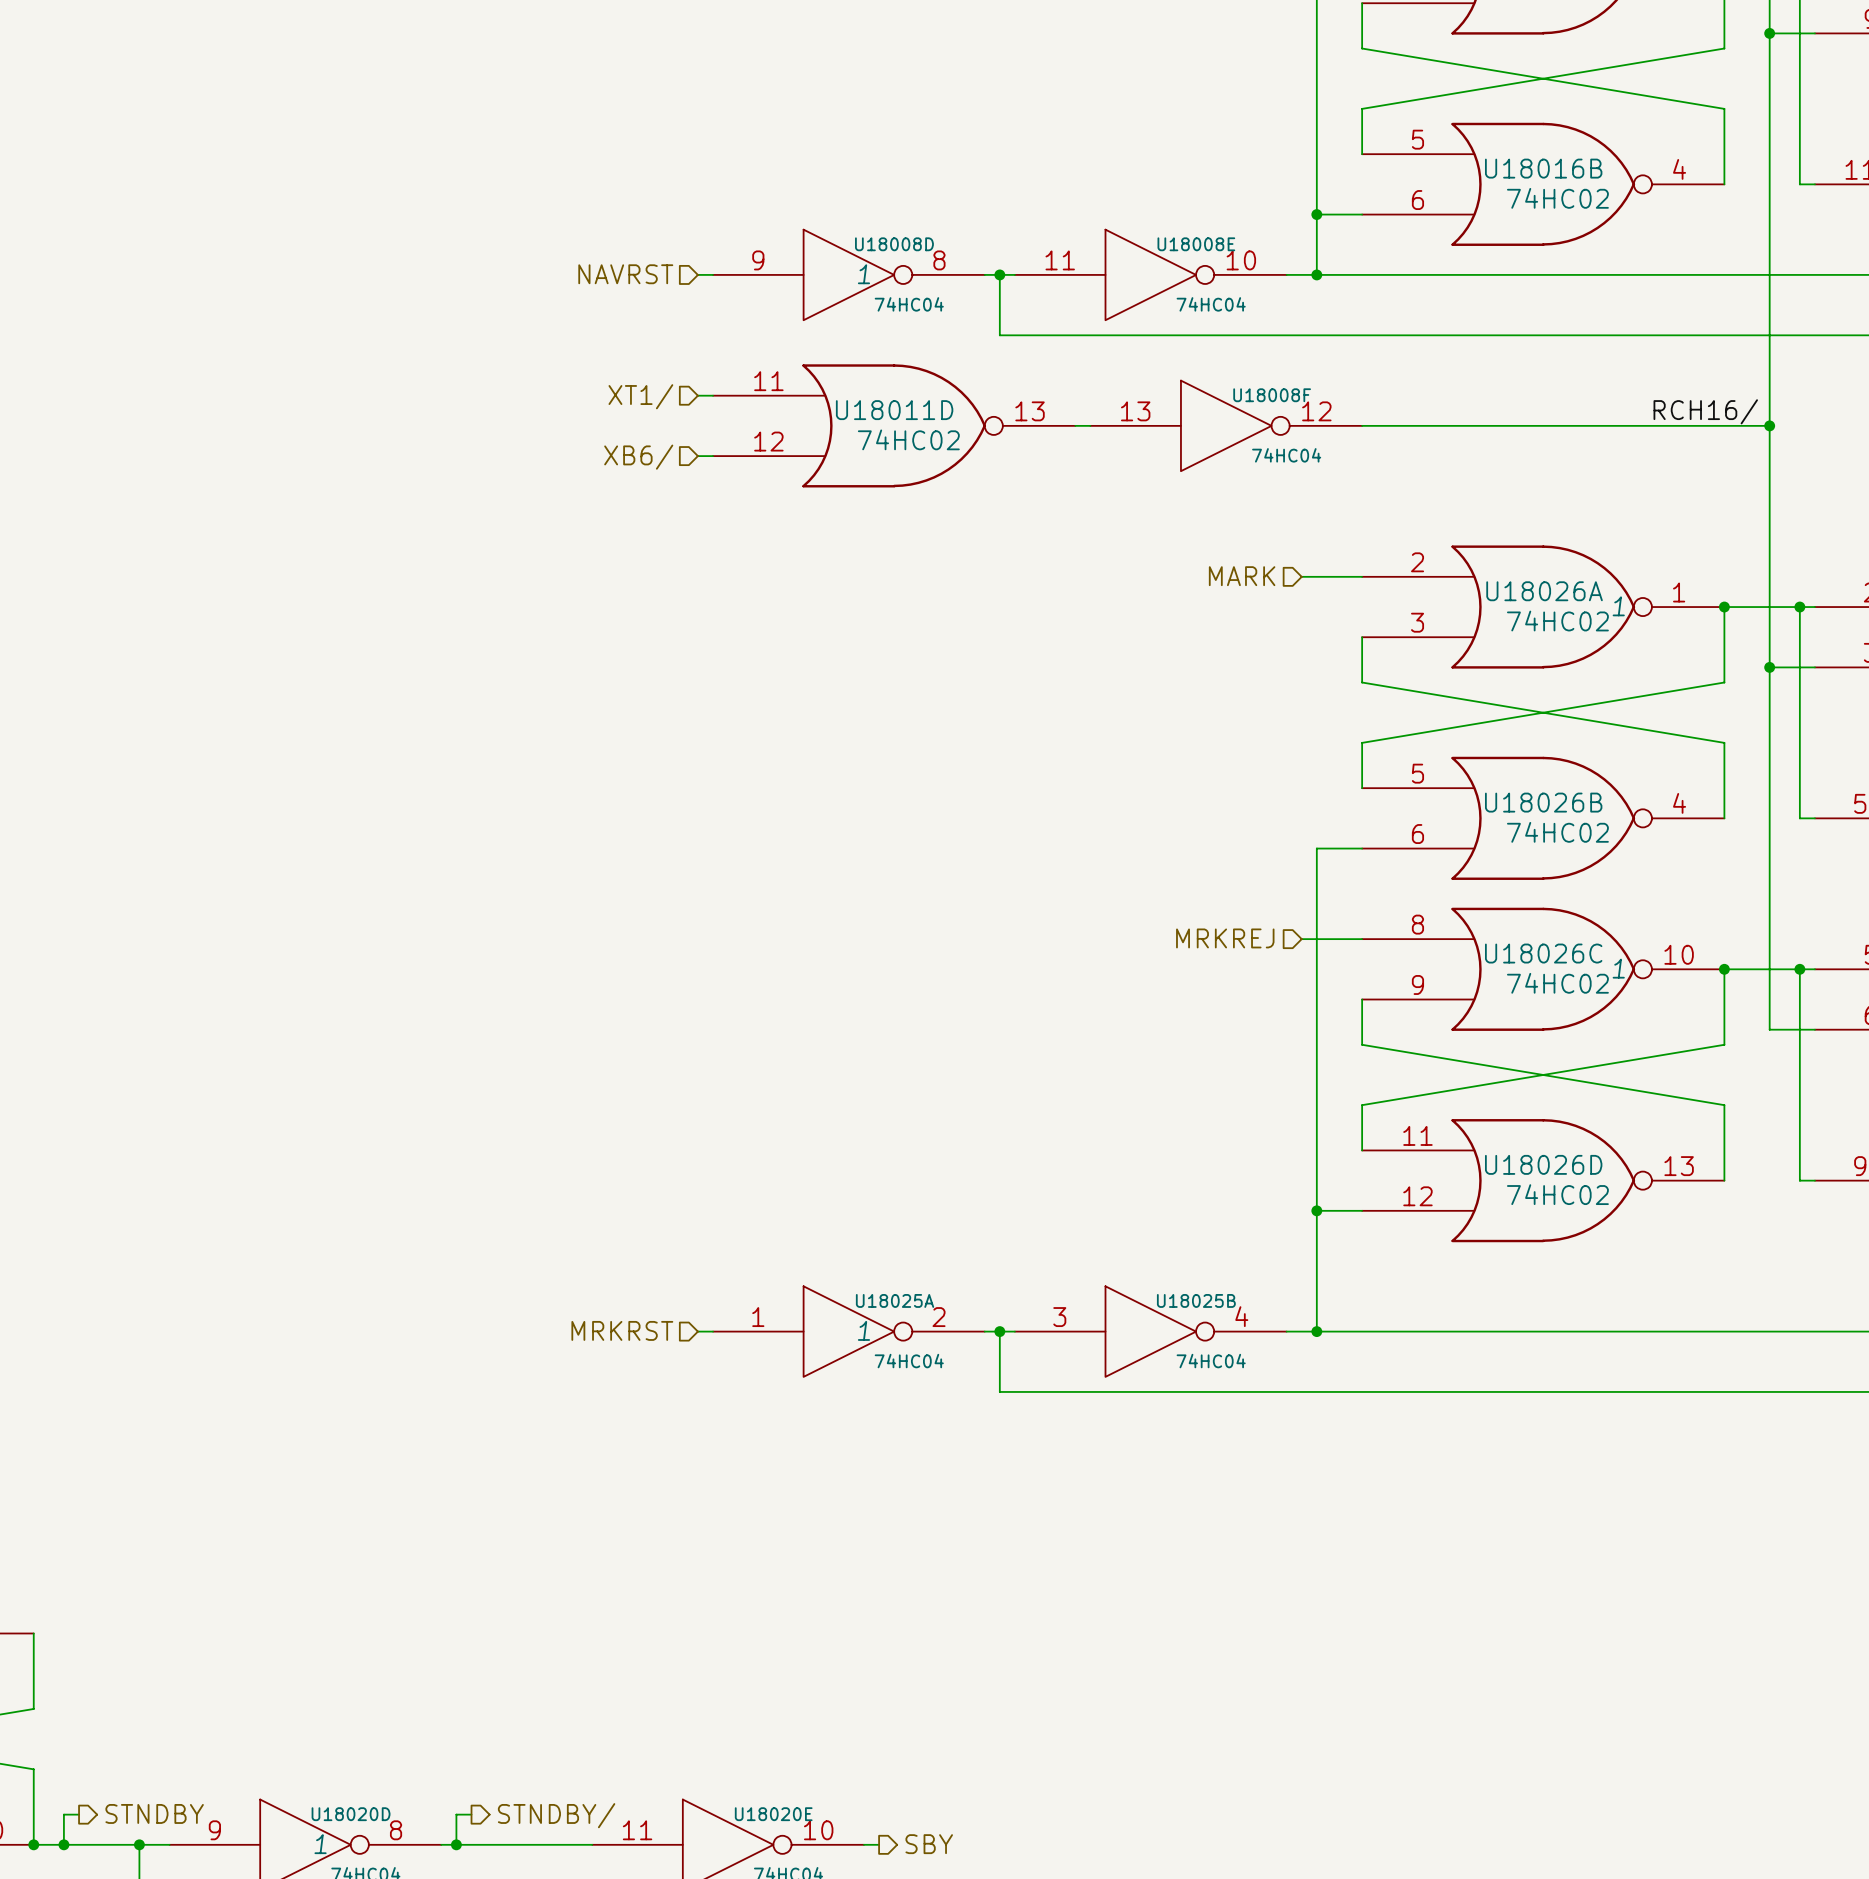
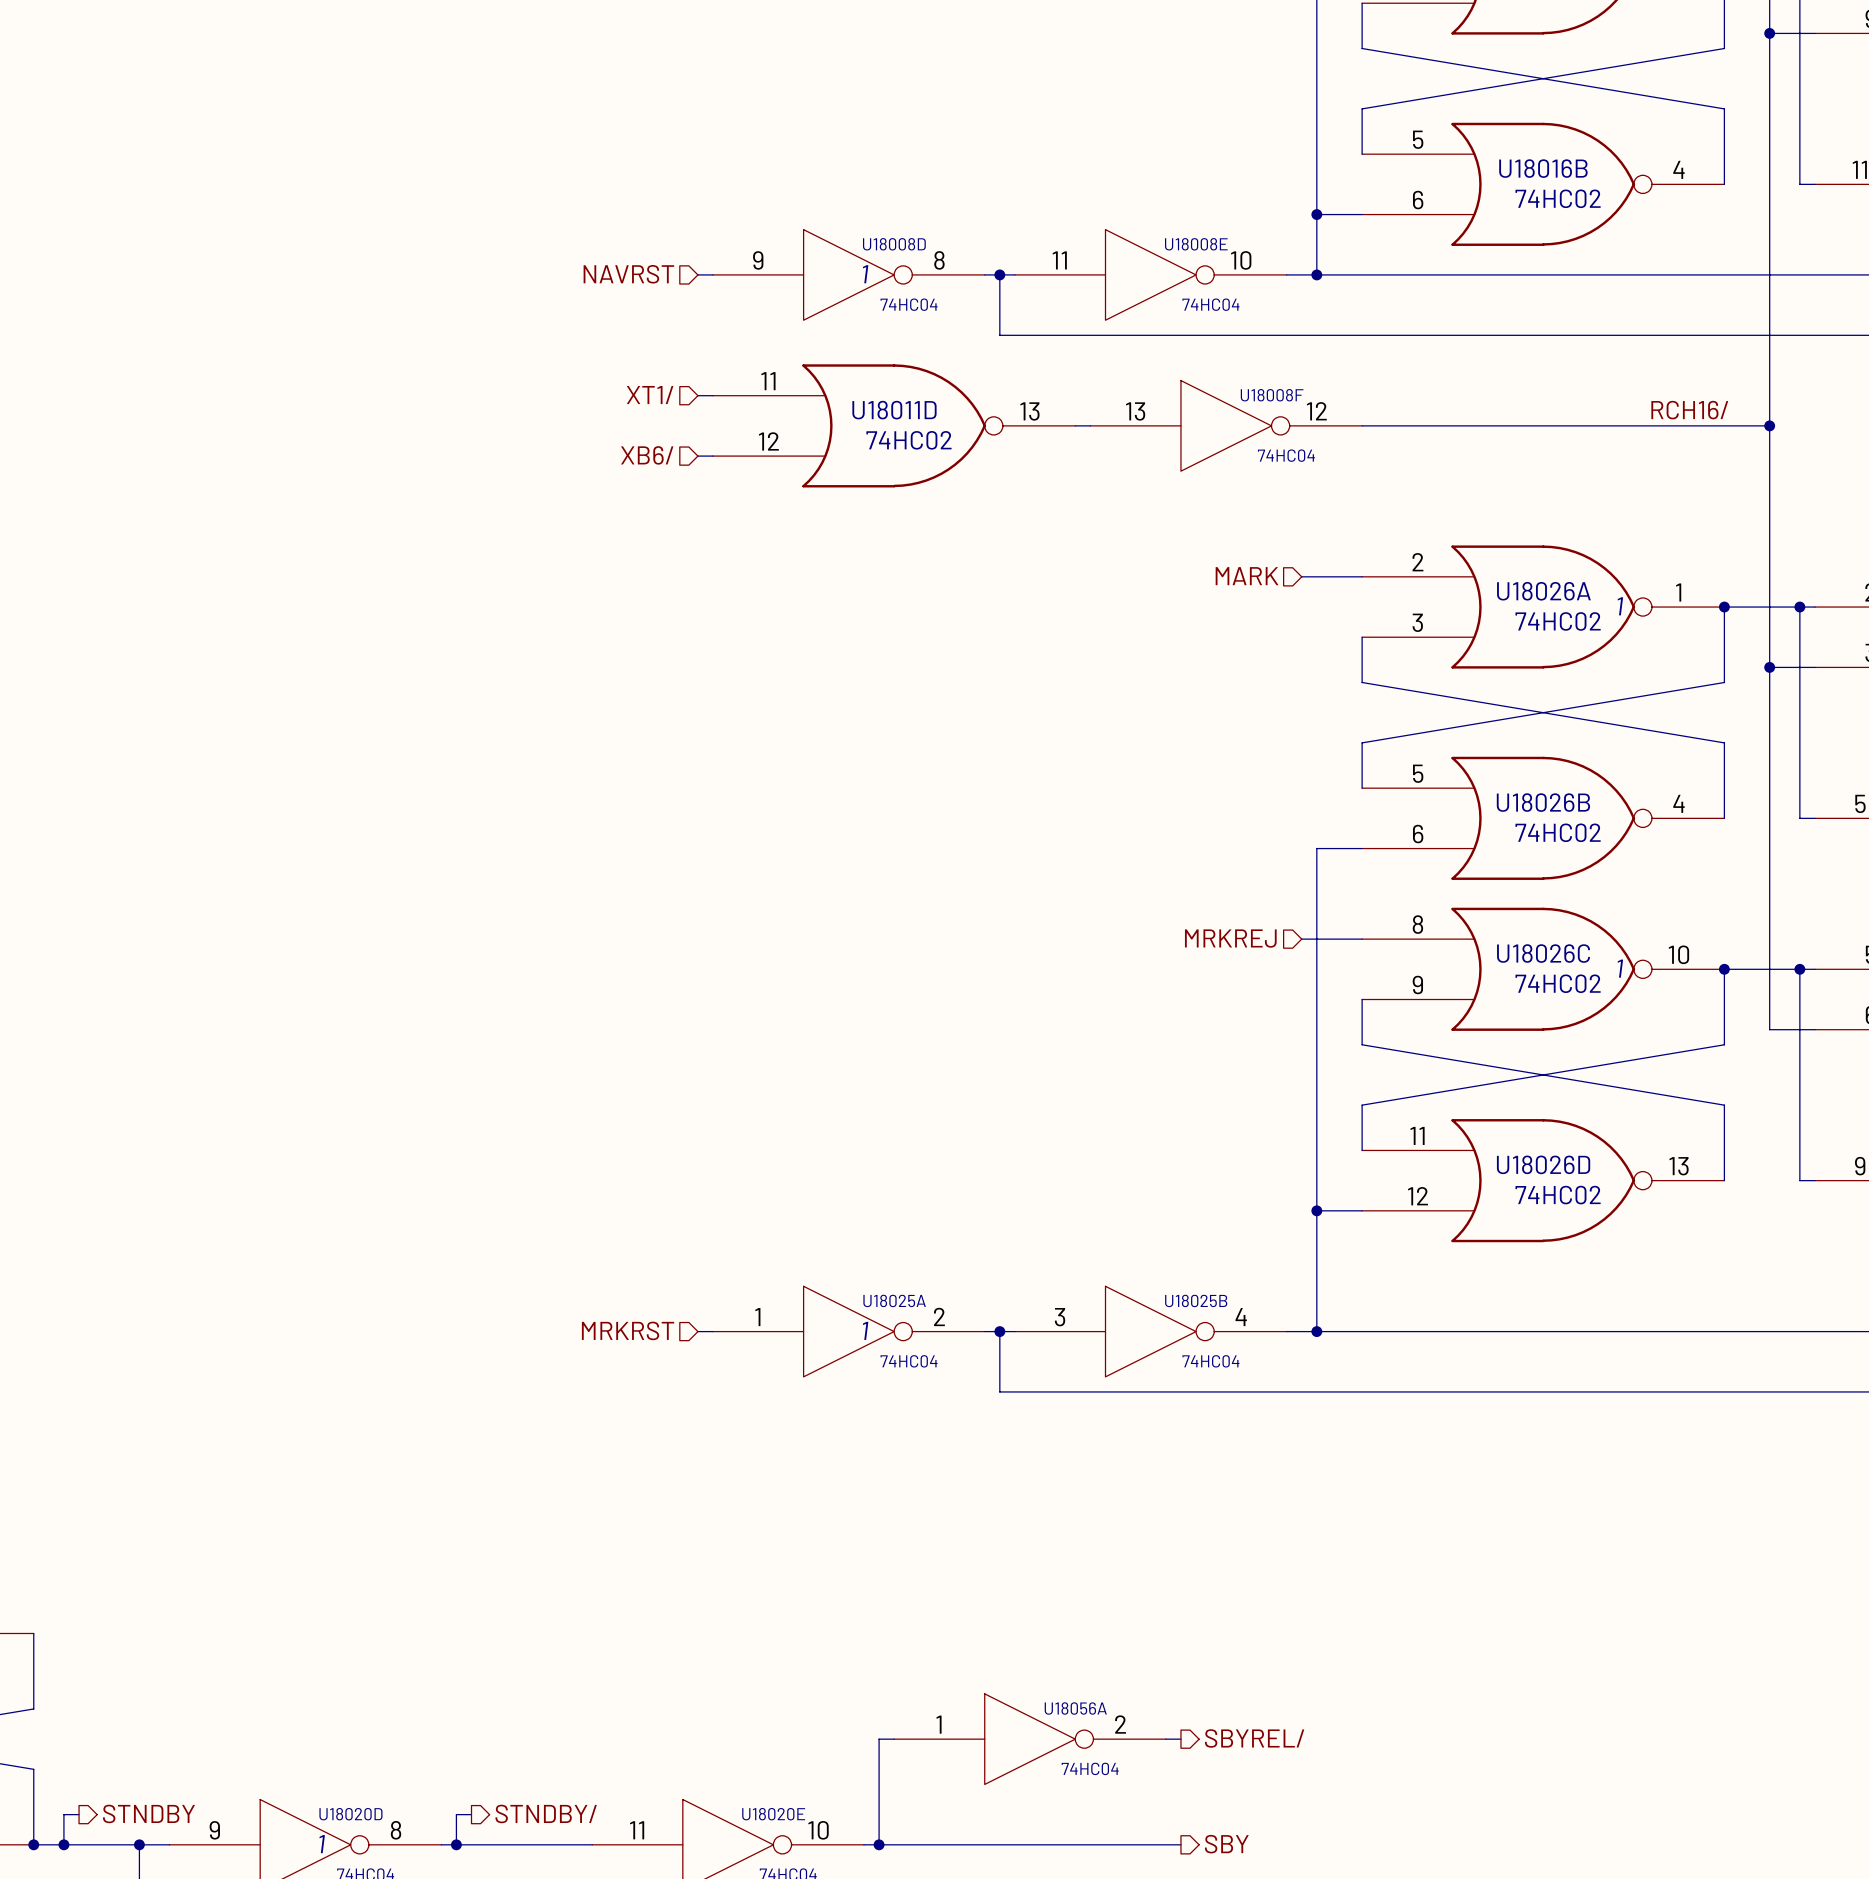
wire: none -> (894, 1739) (879, 1739) (879, 1844) (1180, 1844)
U18056A: none -> 74HC04 (1030, 1739)
wire: none -> (1165, 1739) (1180, 1739)
hierarchical label: none -> SBYREL/ (1254, 1738)
junction: none -> (879, 1844)
hierarchical label: SBY (929, 1844) -> none
hierarchical label: none -> SBY (1226, 1844)

